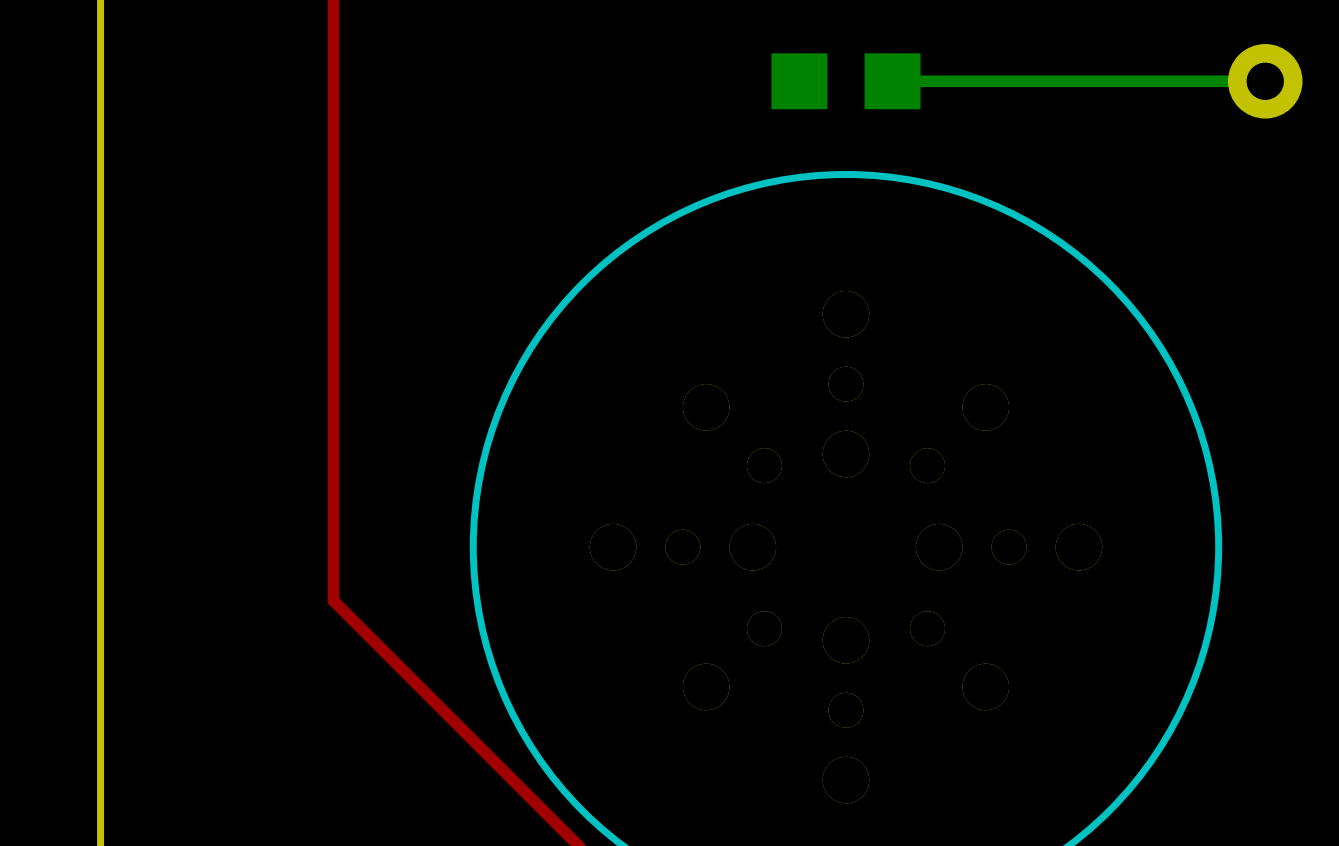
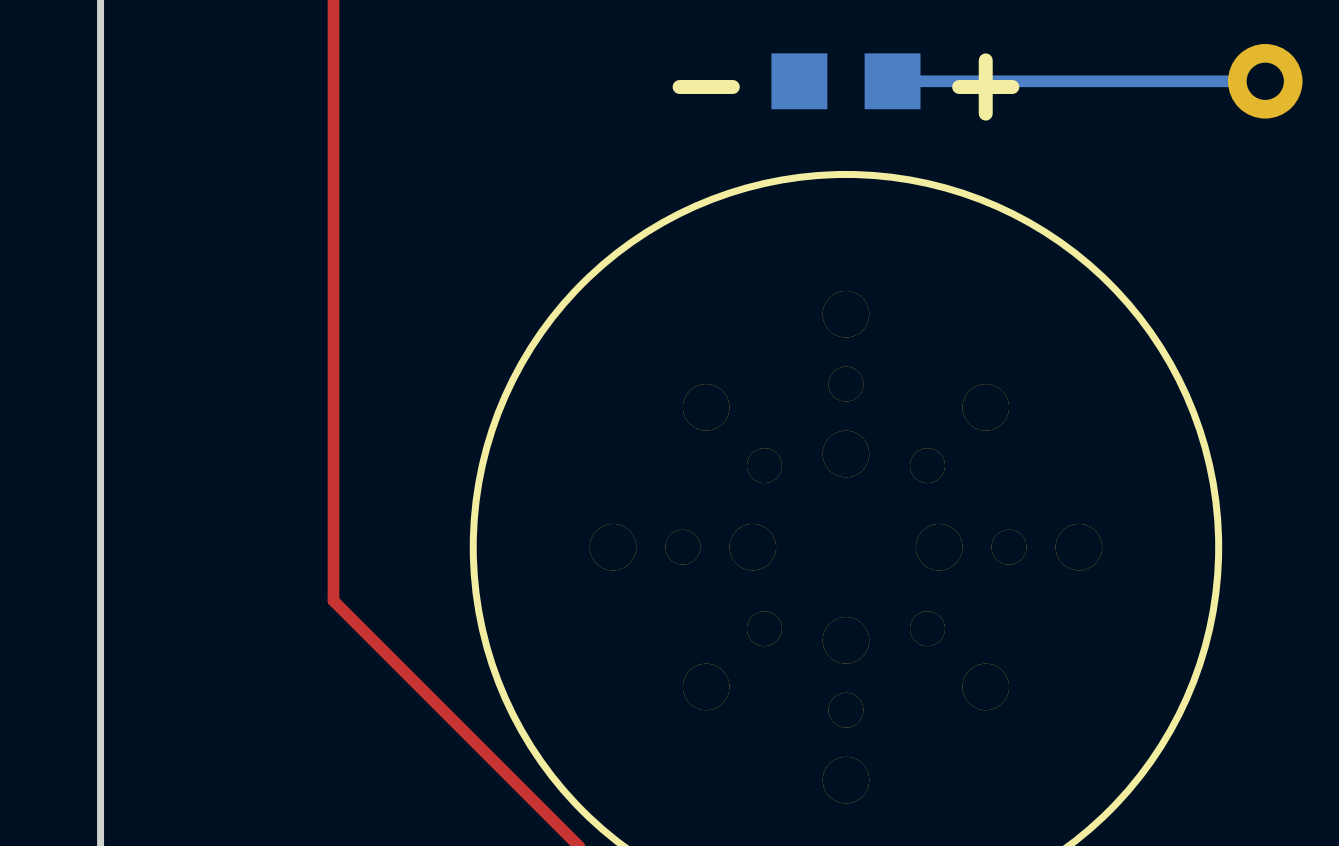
text: none -> - (706, 86)
text: none -> + (985, 86)

